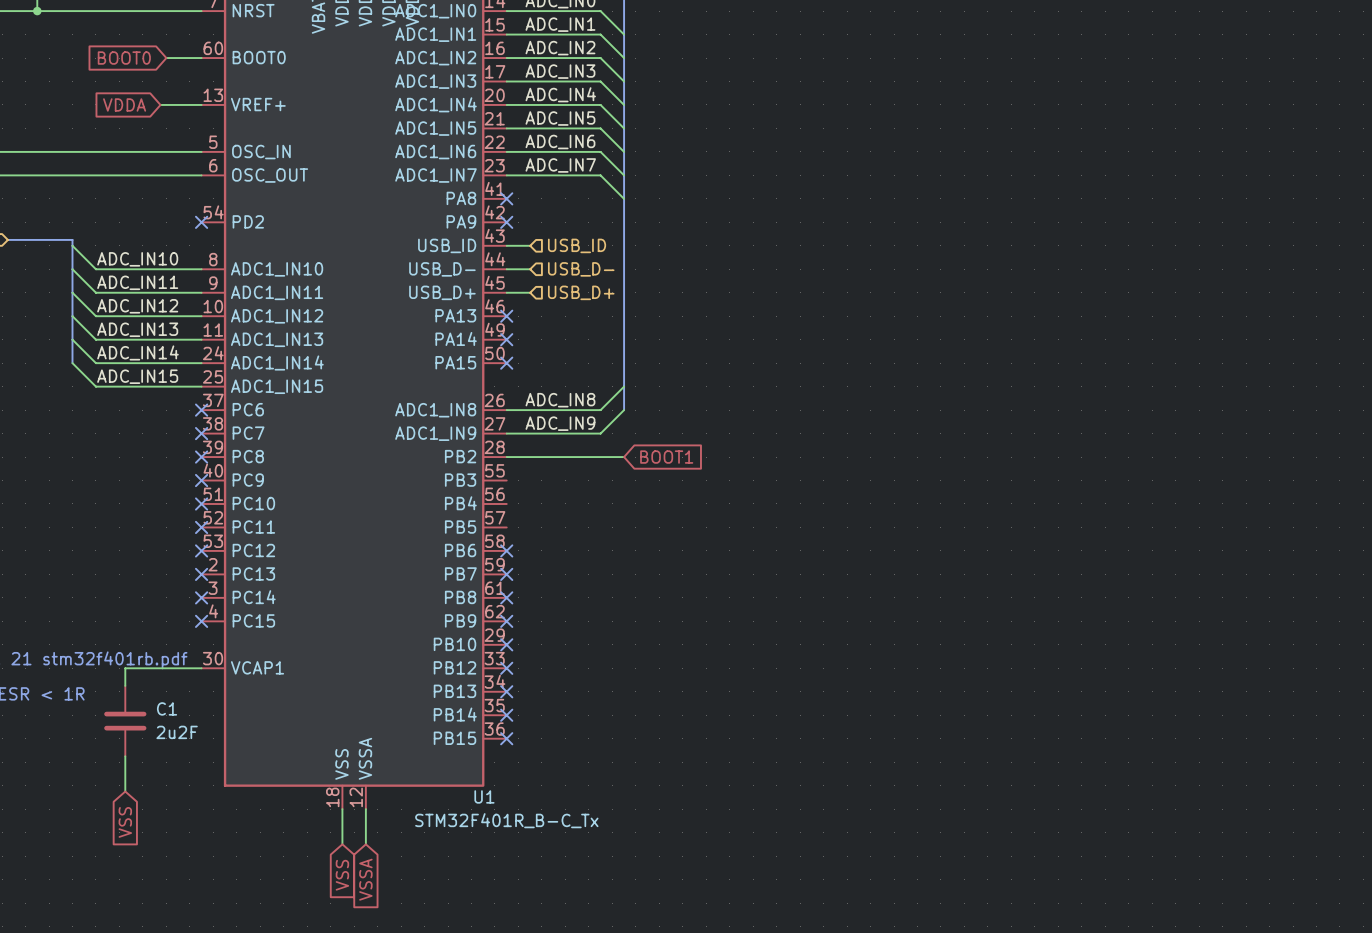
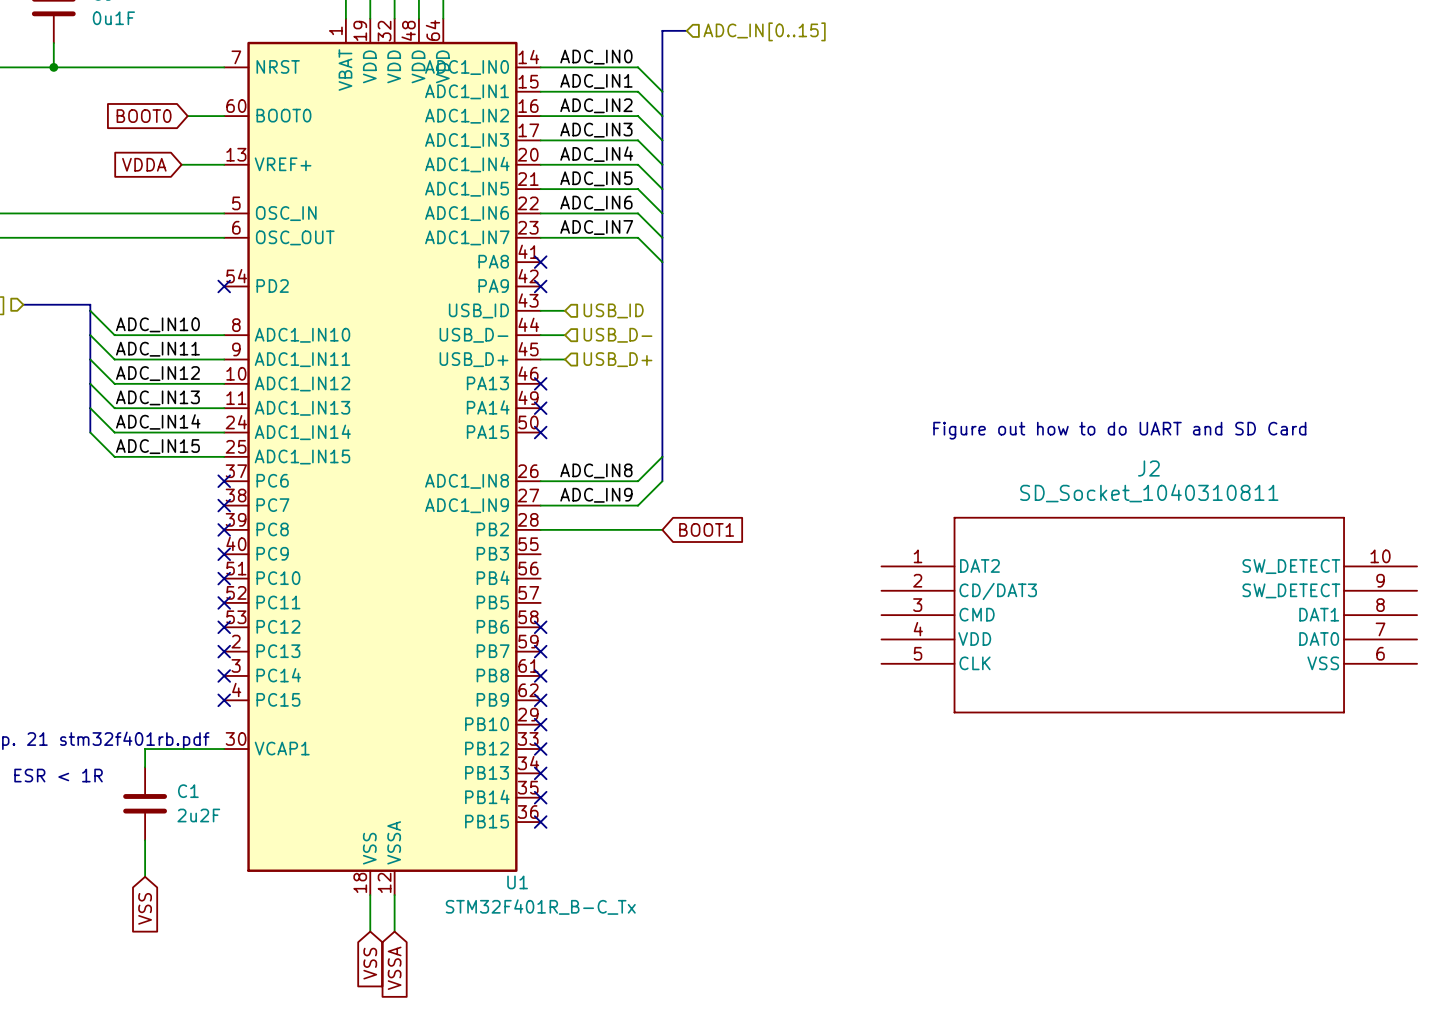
text: none -> Figure out how to do UART and SD Card (1119, 430)
J2: none -> SD_Socket_1040310811 (1149, 615)

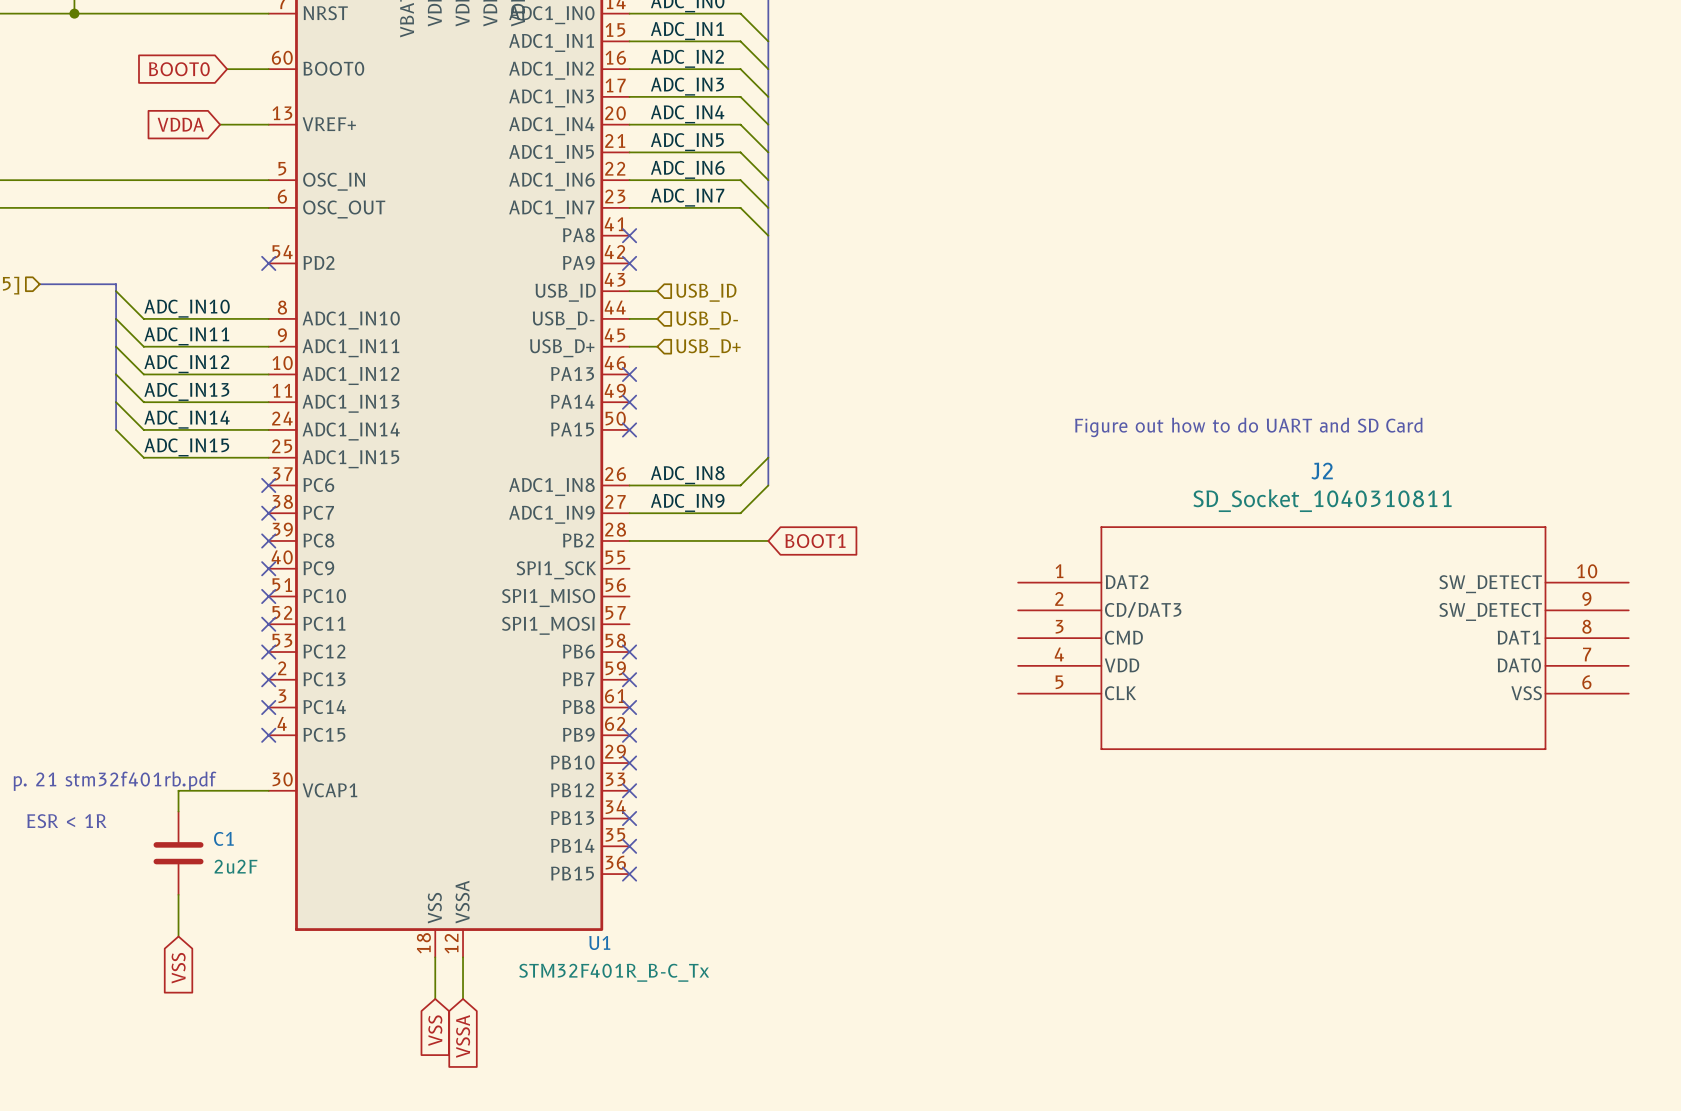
U1 pin name: PB3 (492, 553) -> SPI1_SCK (556, 570)
U1 pin name: PB4 (493, 577) -> SPI1_MISO (548, 598)
U1 pin name: PB5 (492, 602) -> SPI1_MOSI (548, 625)

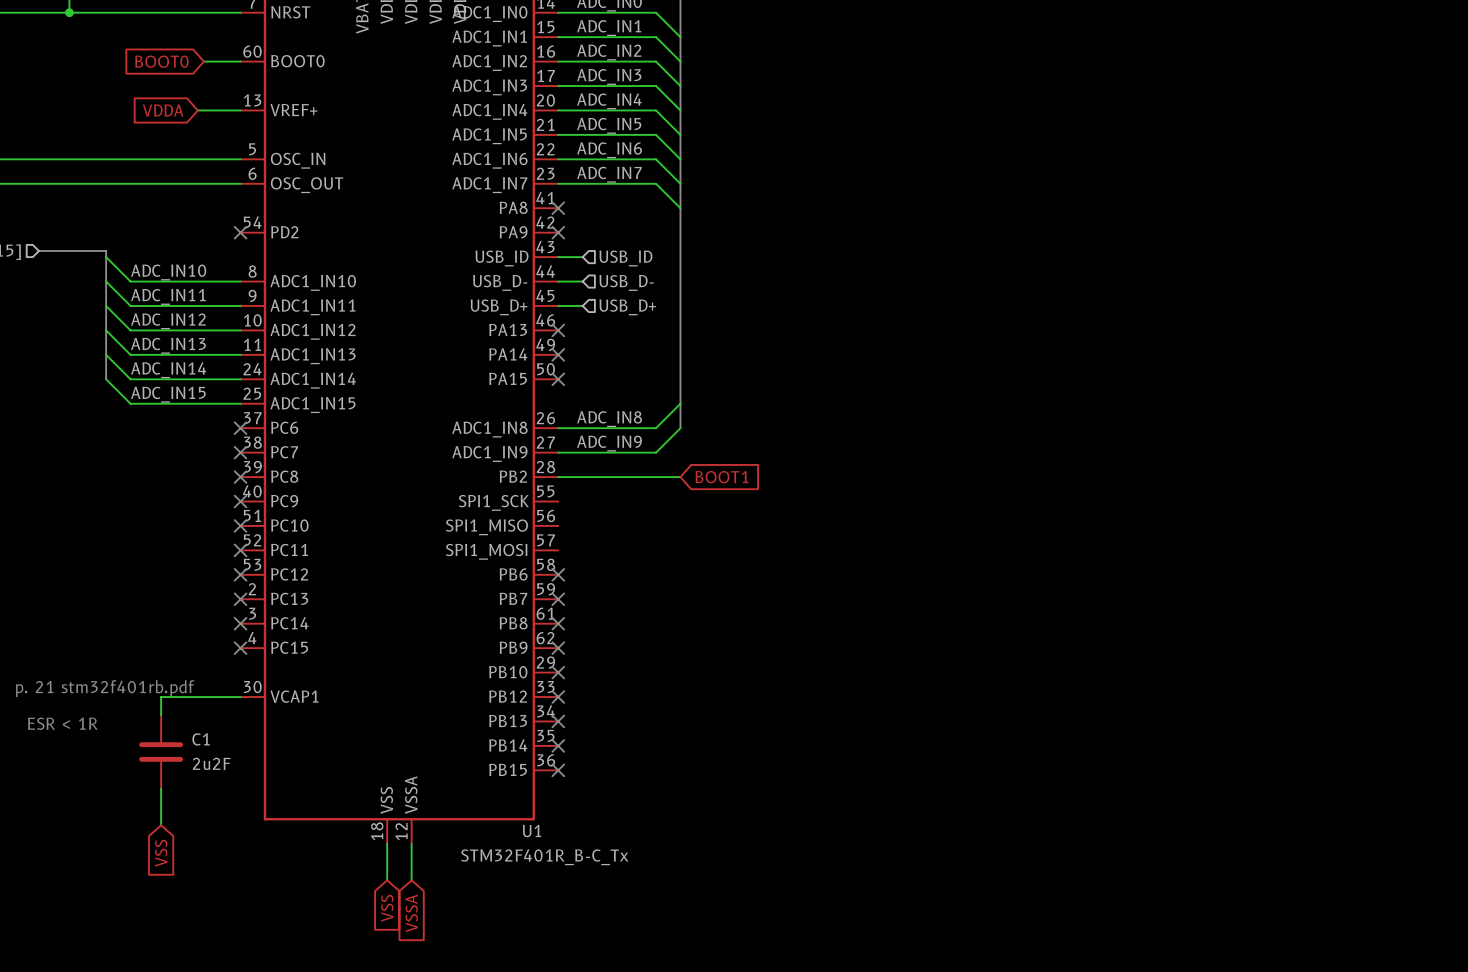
text: Figure out how to do UART and SD Card (1248, 427) -> none
J2: SD_Socket_1040310811 (1323, 638) -> none

